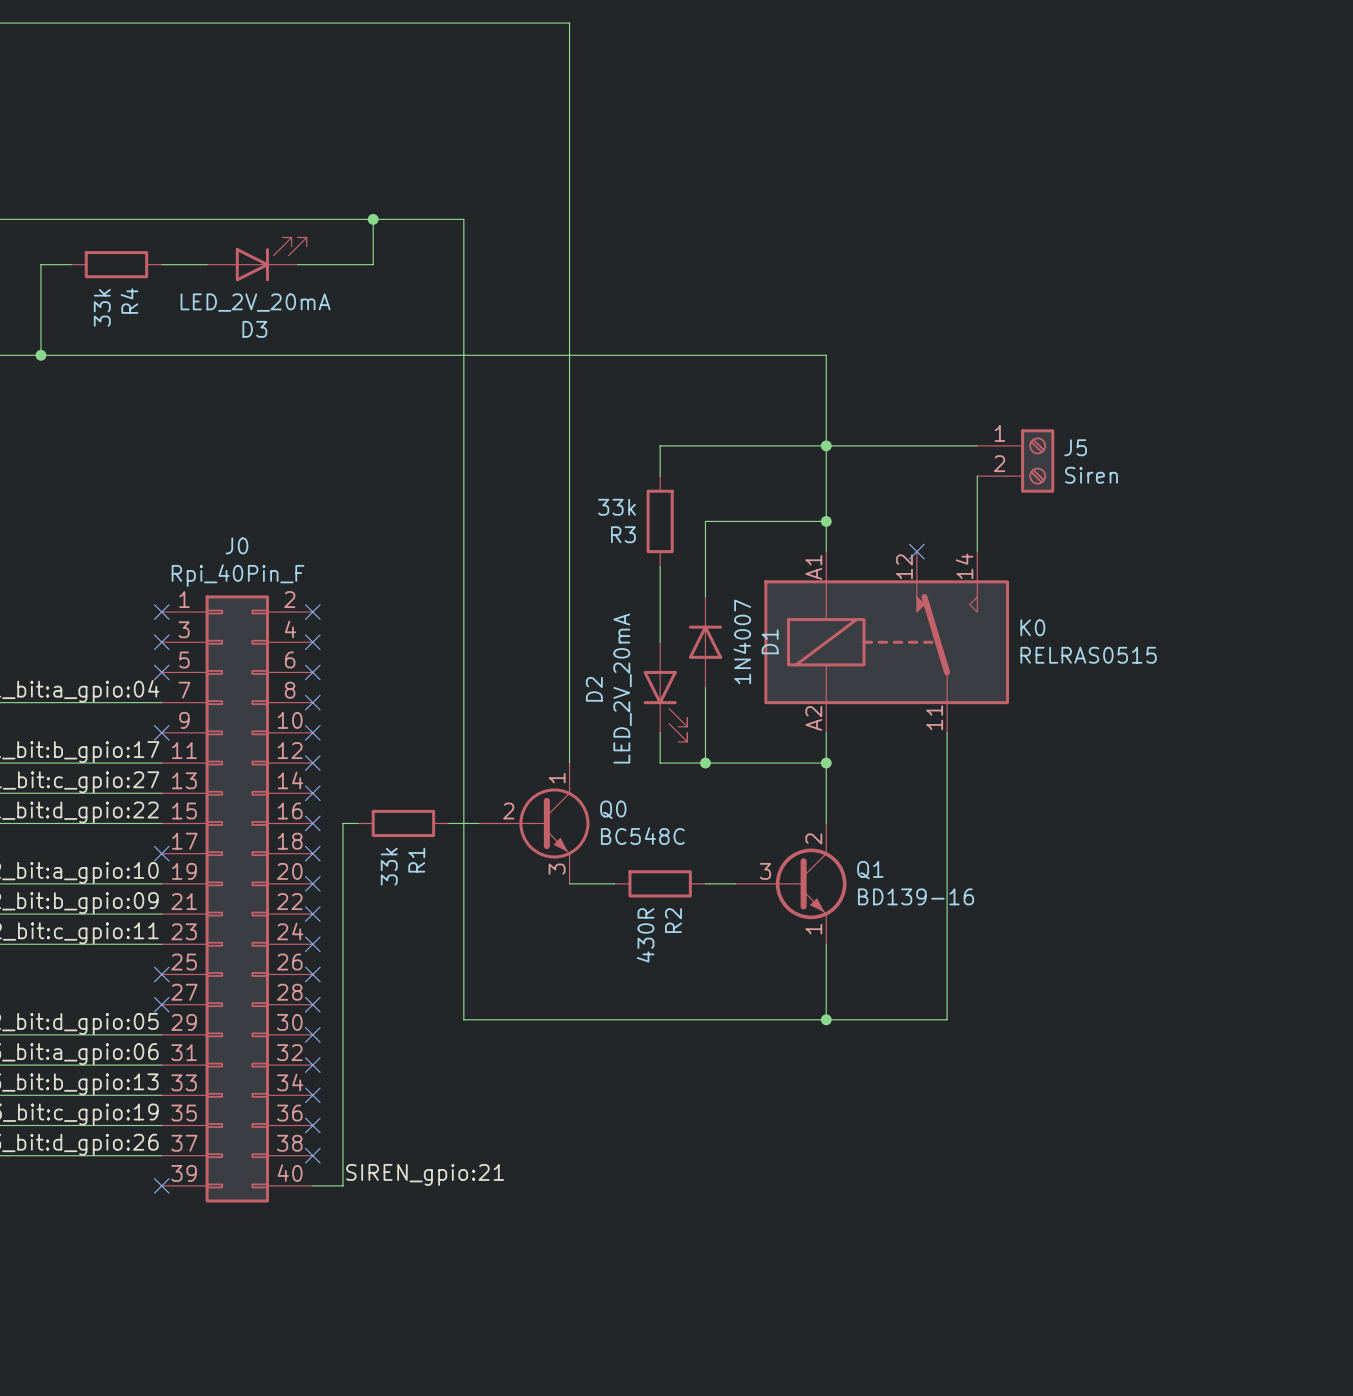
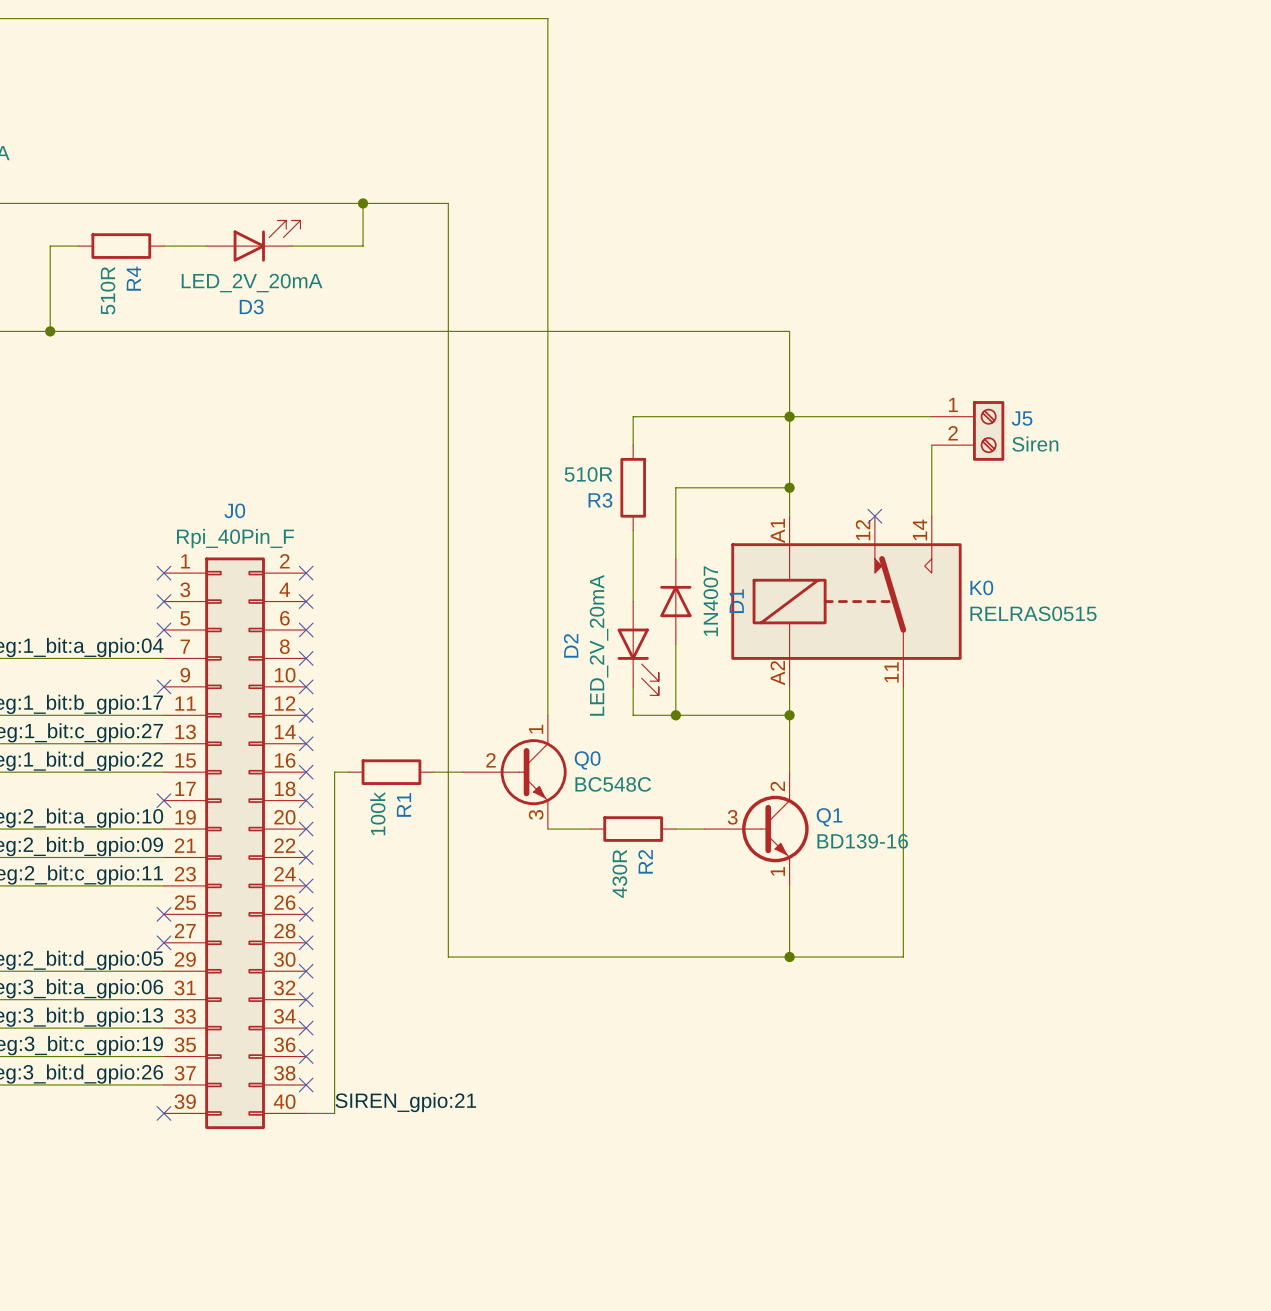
R4 value: 33k (102, 307) -> 510R (107, 290)
R3 value: 33k (616, 507) -> 510R (588, 474)
R1 value: 33k (389, 866) -> 100k (377, 813)

